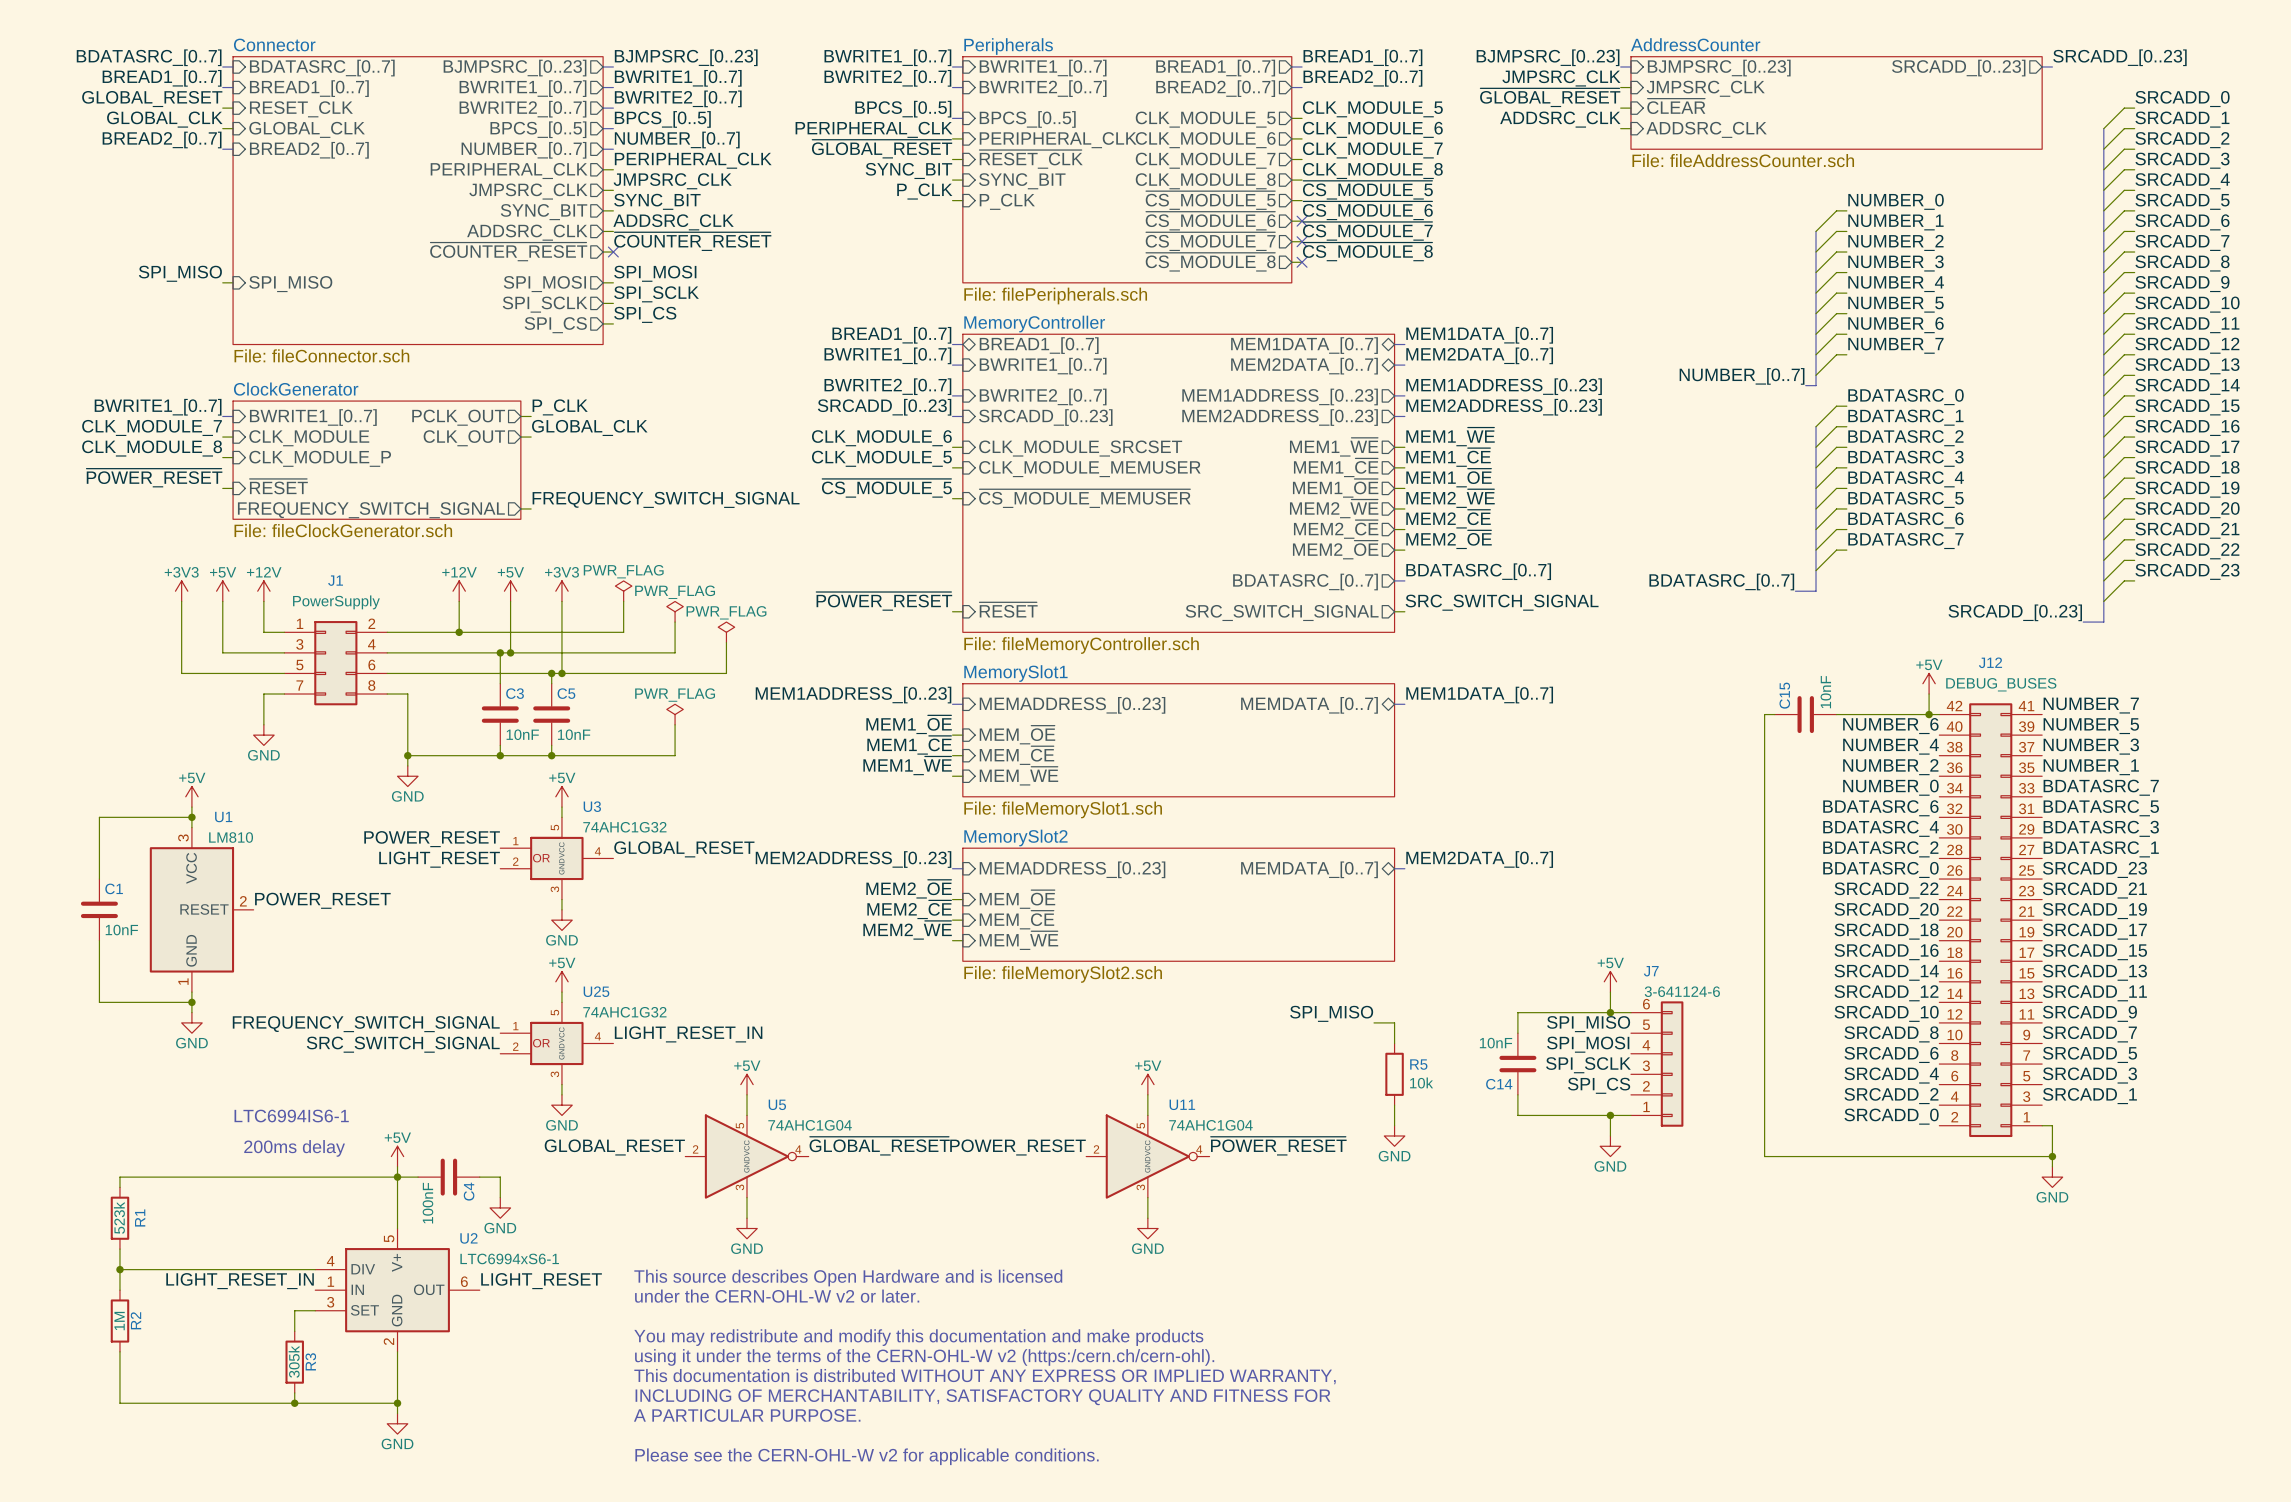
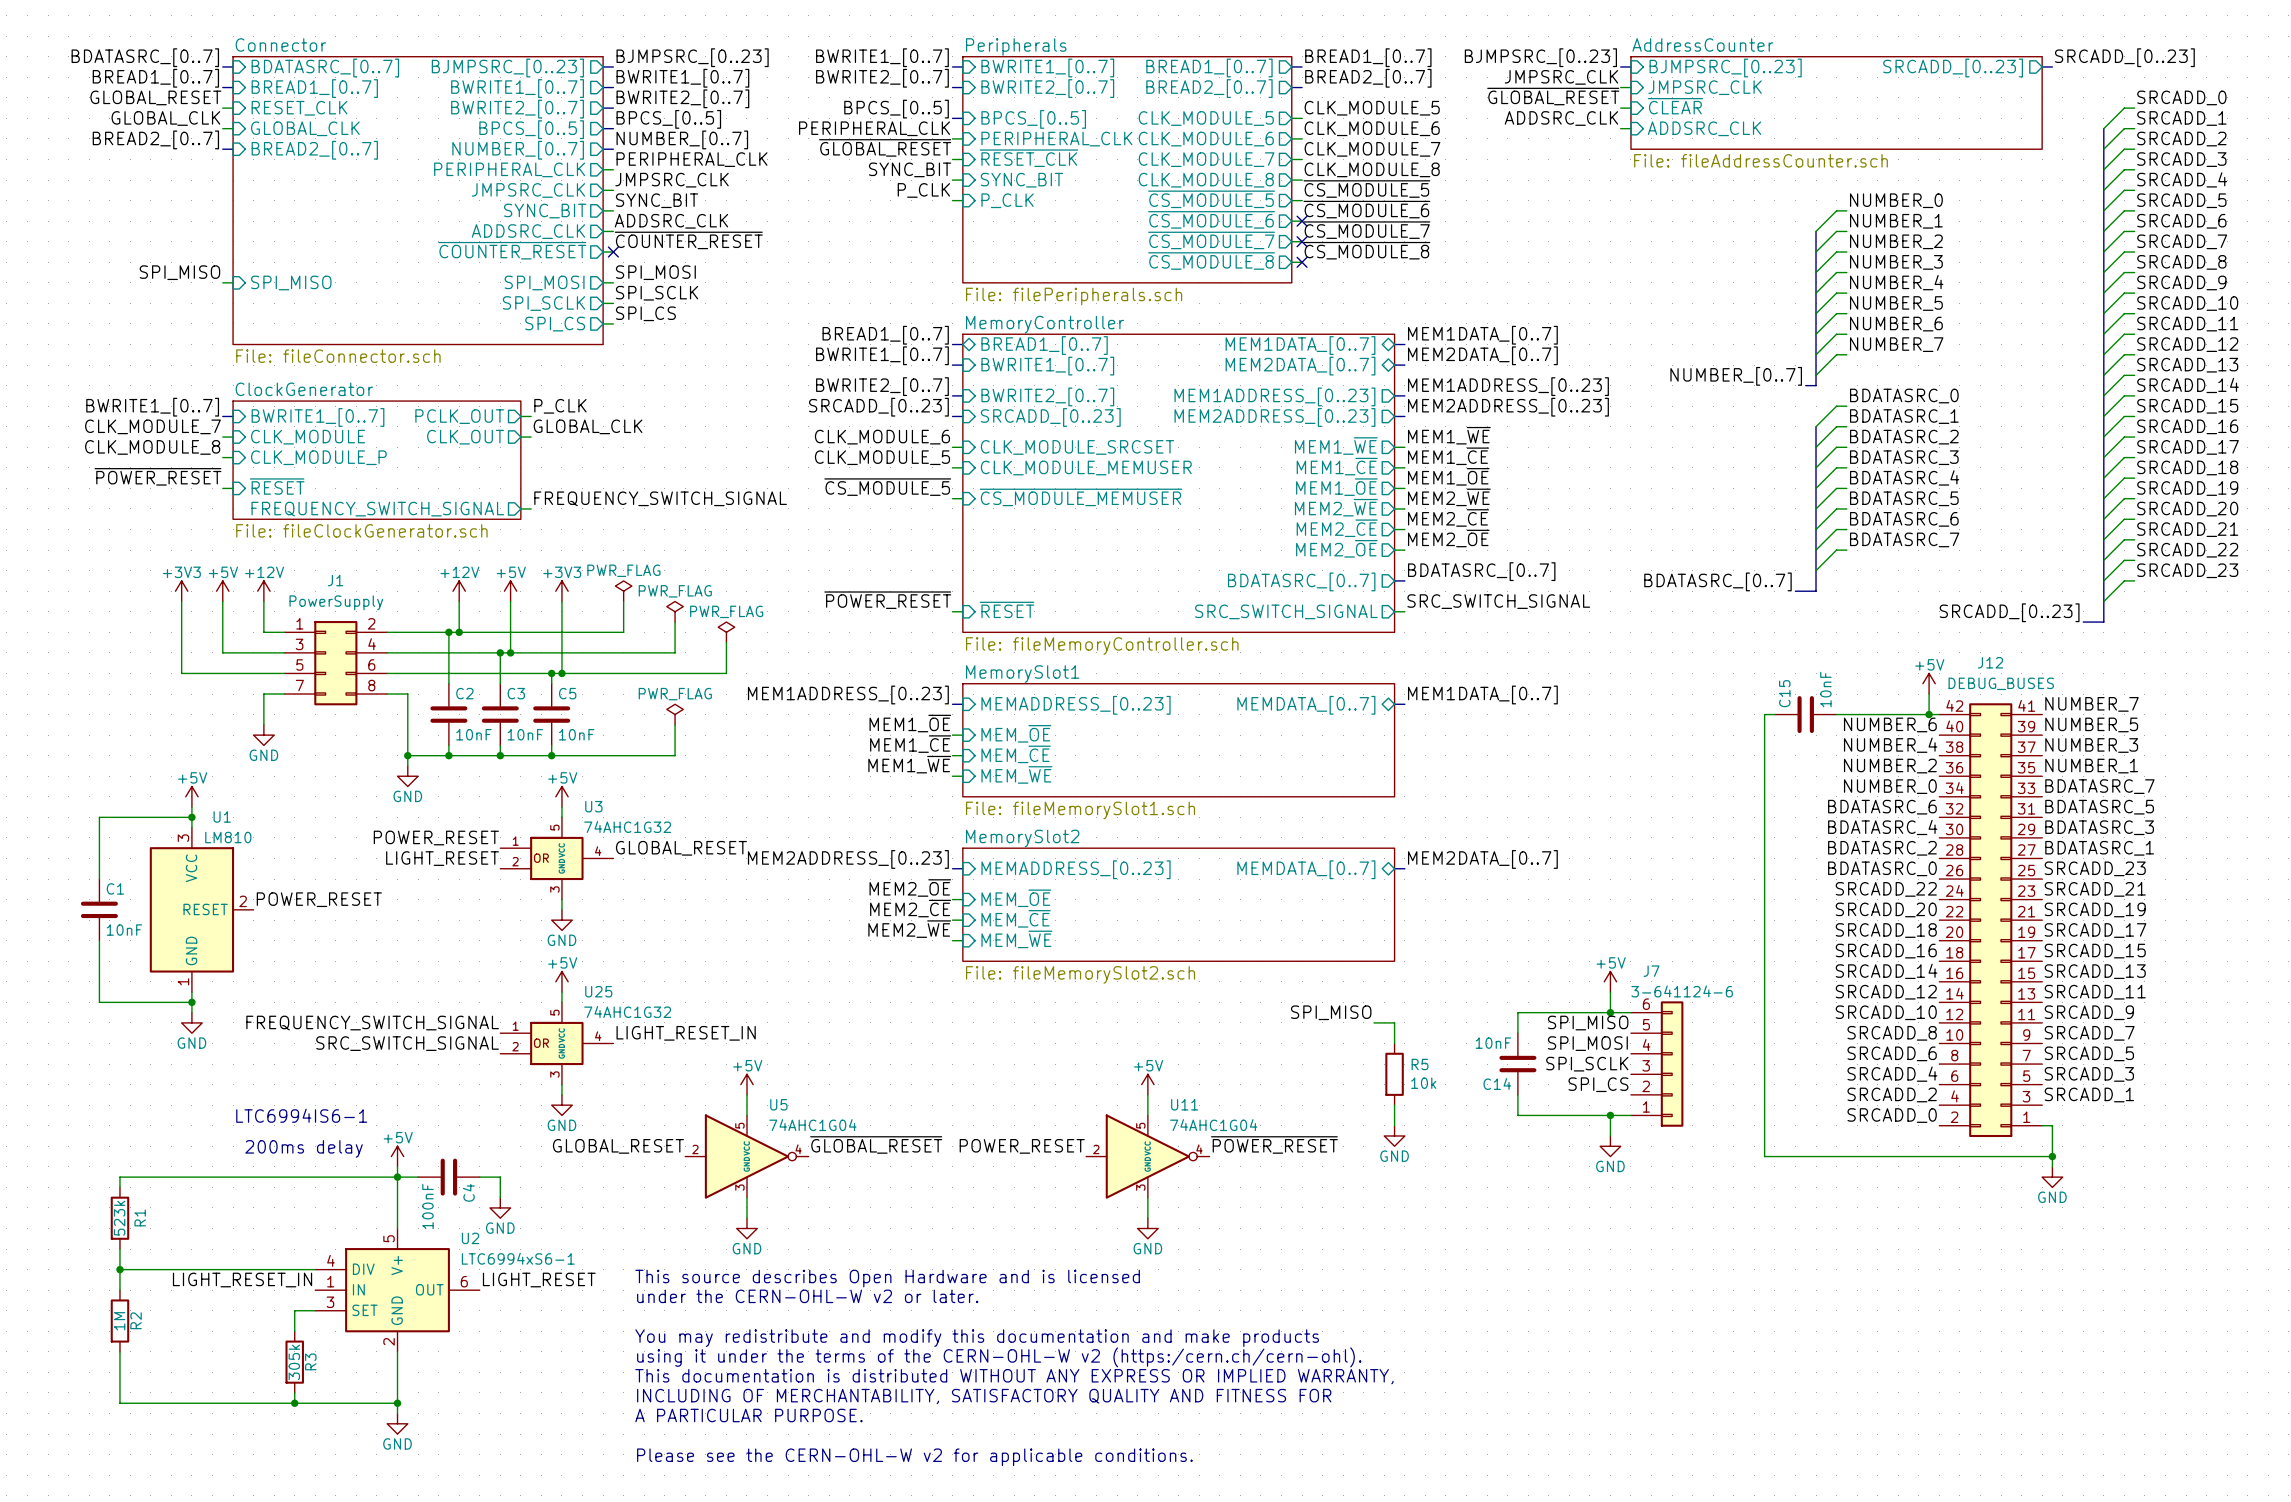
wire: none -> (448, 632) (448, 683)
junction: none -> (448, 632)
C2: none -> 10nF (448, 714)
wire: none -> (448, 745) (448, 755)
junction: none -> (448, 755)

